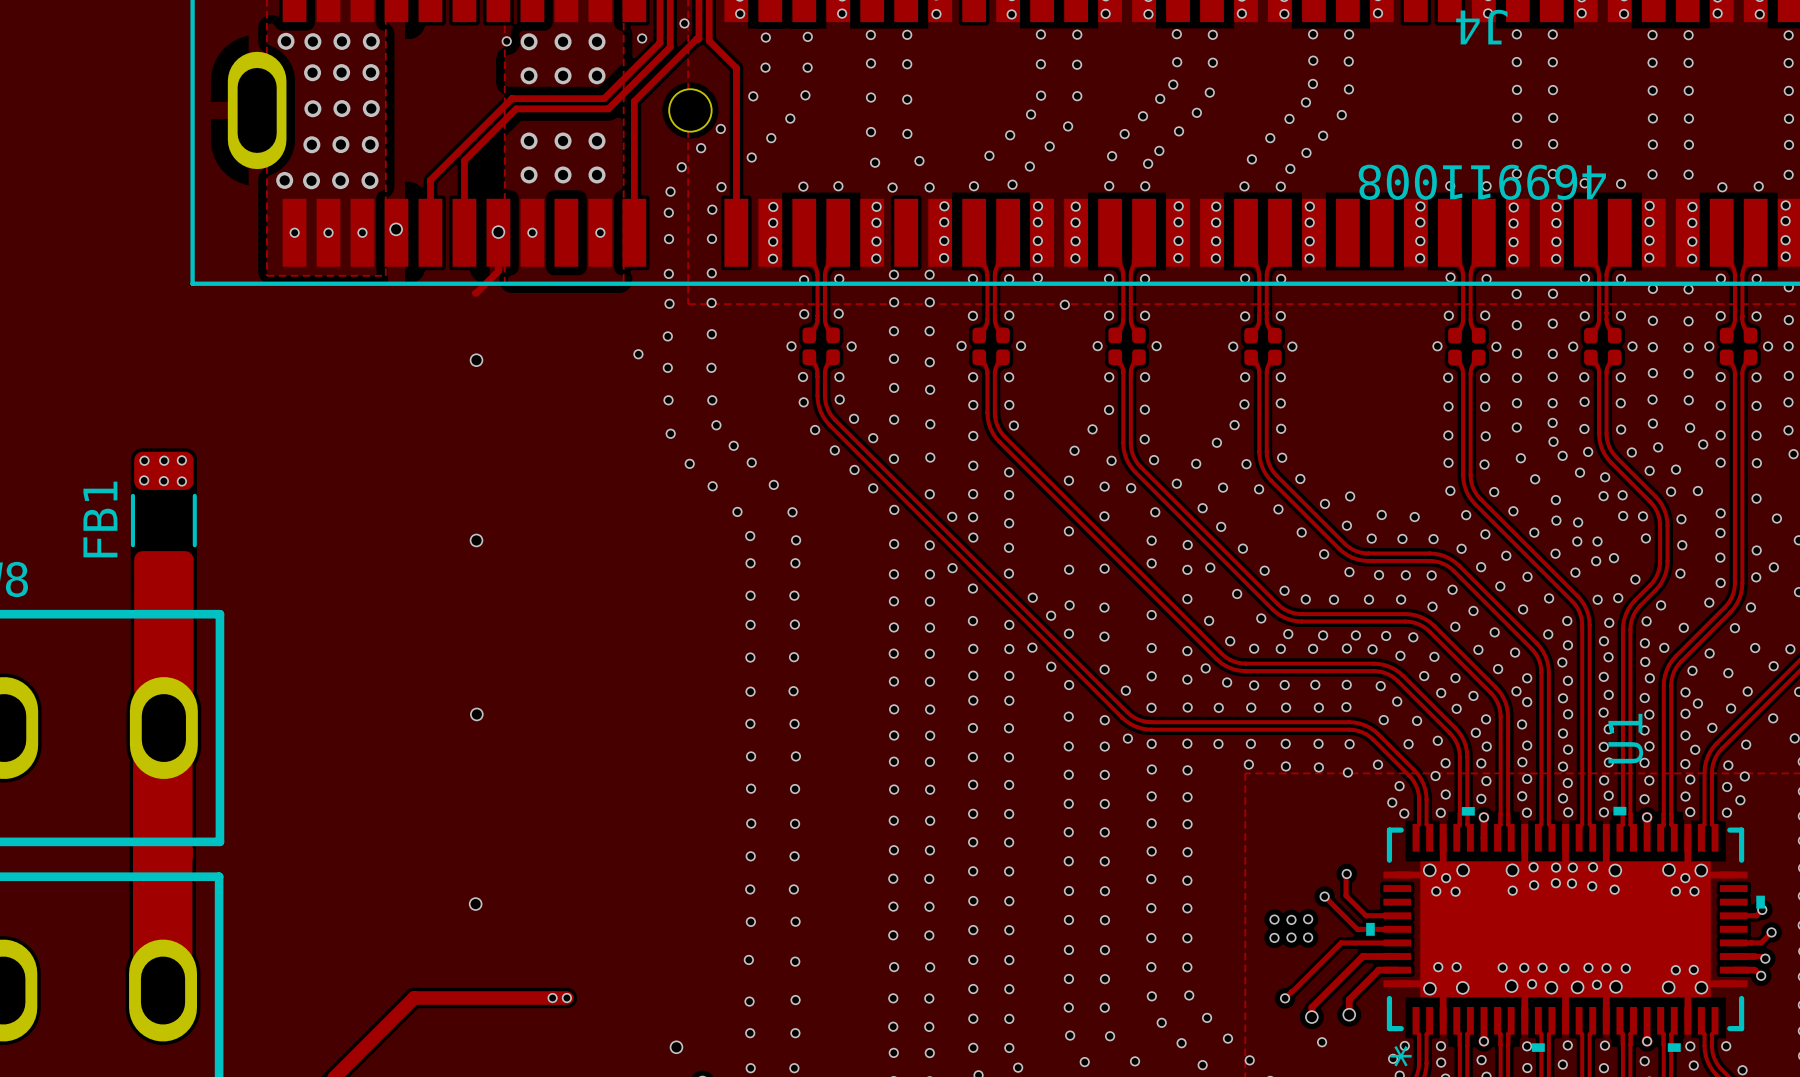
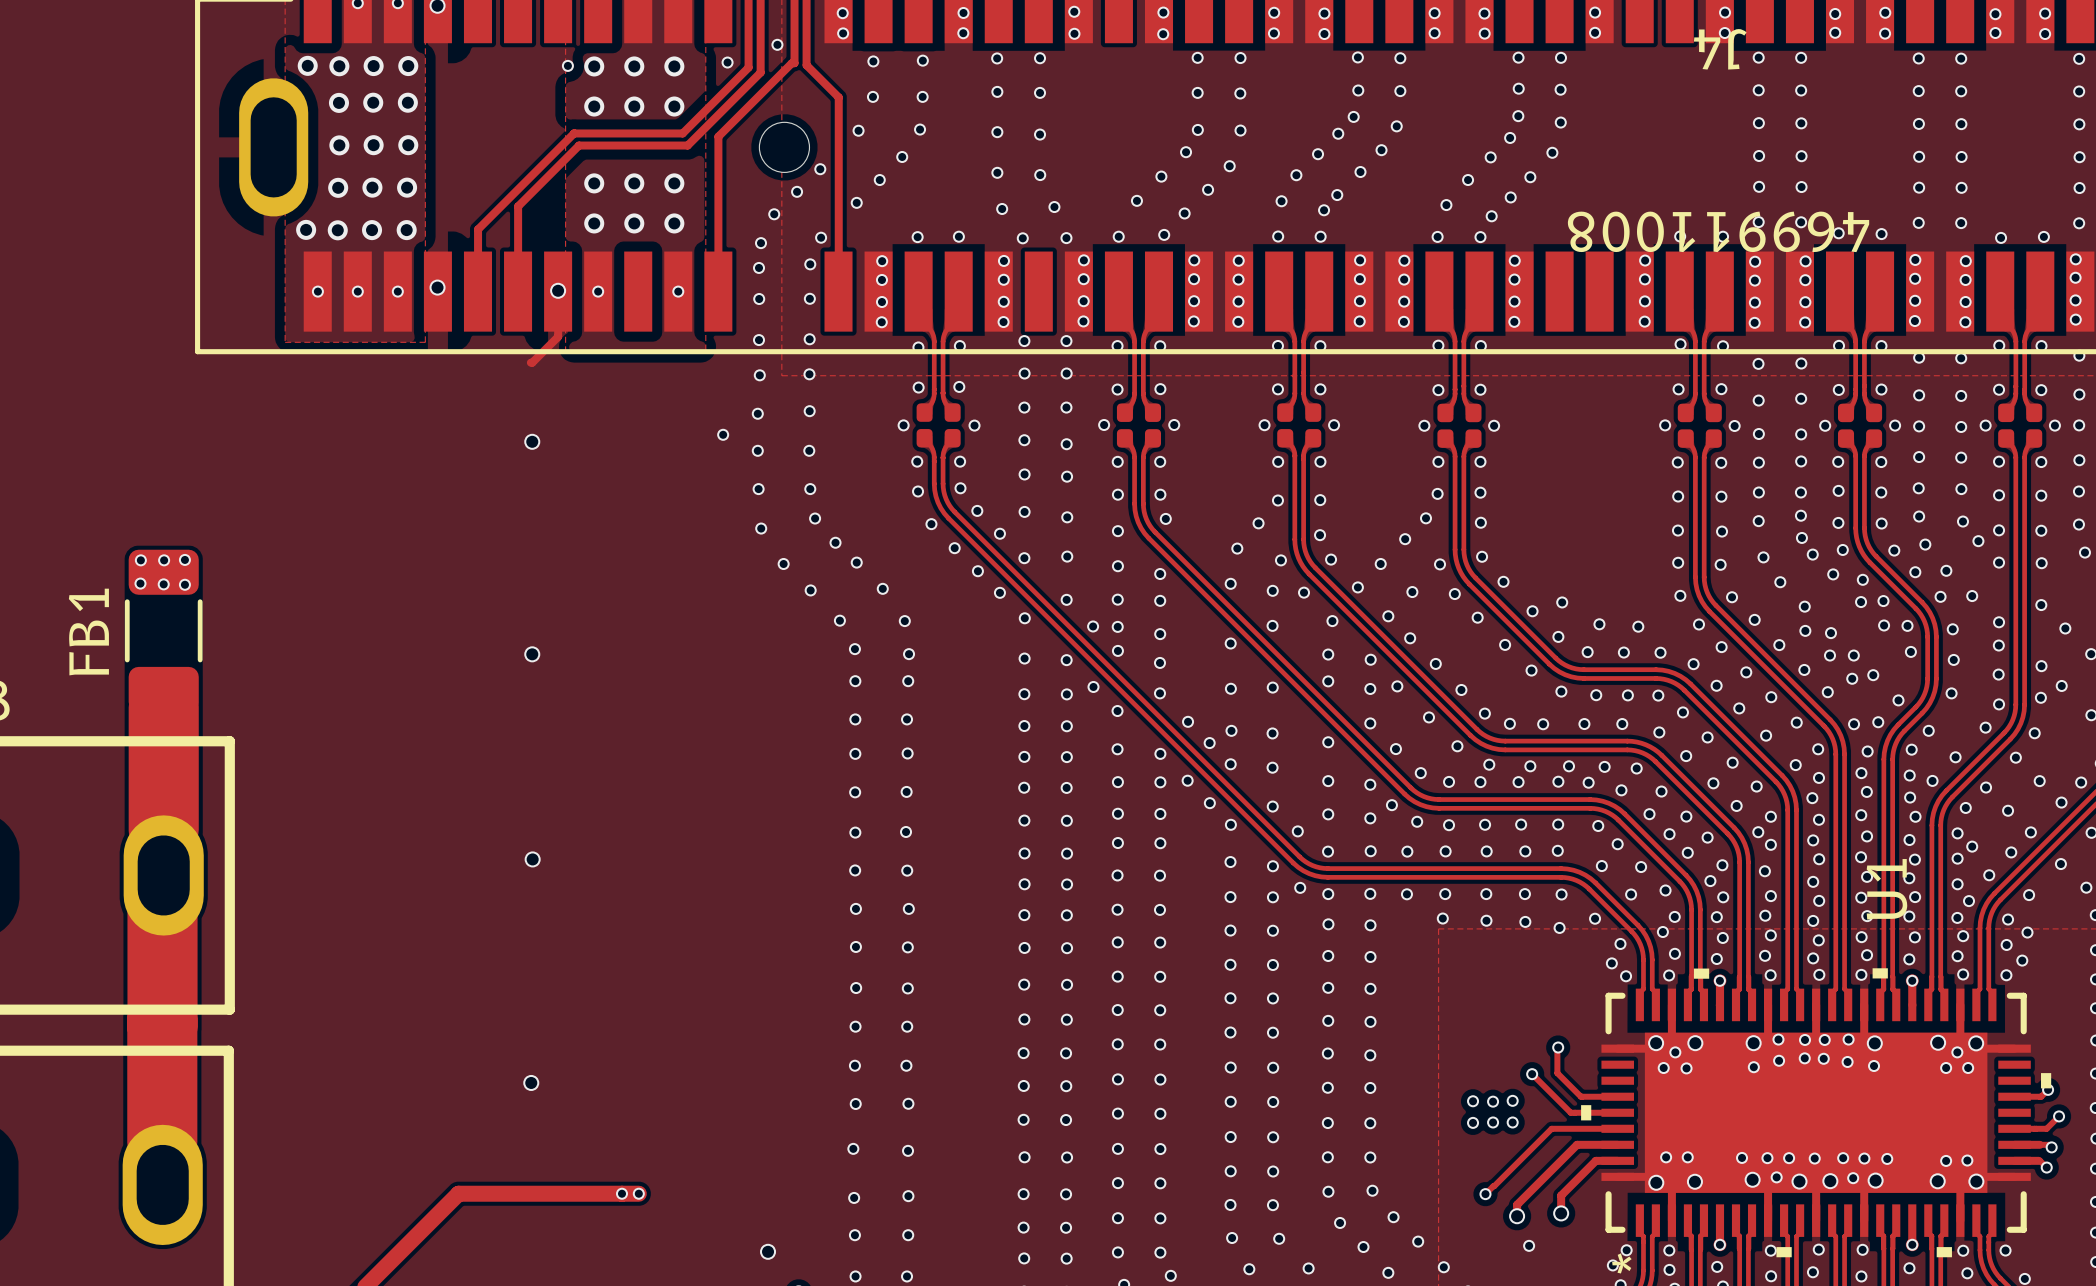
via: (1037, 277) -> none
via: (1064, 304) -> none

